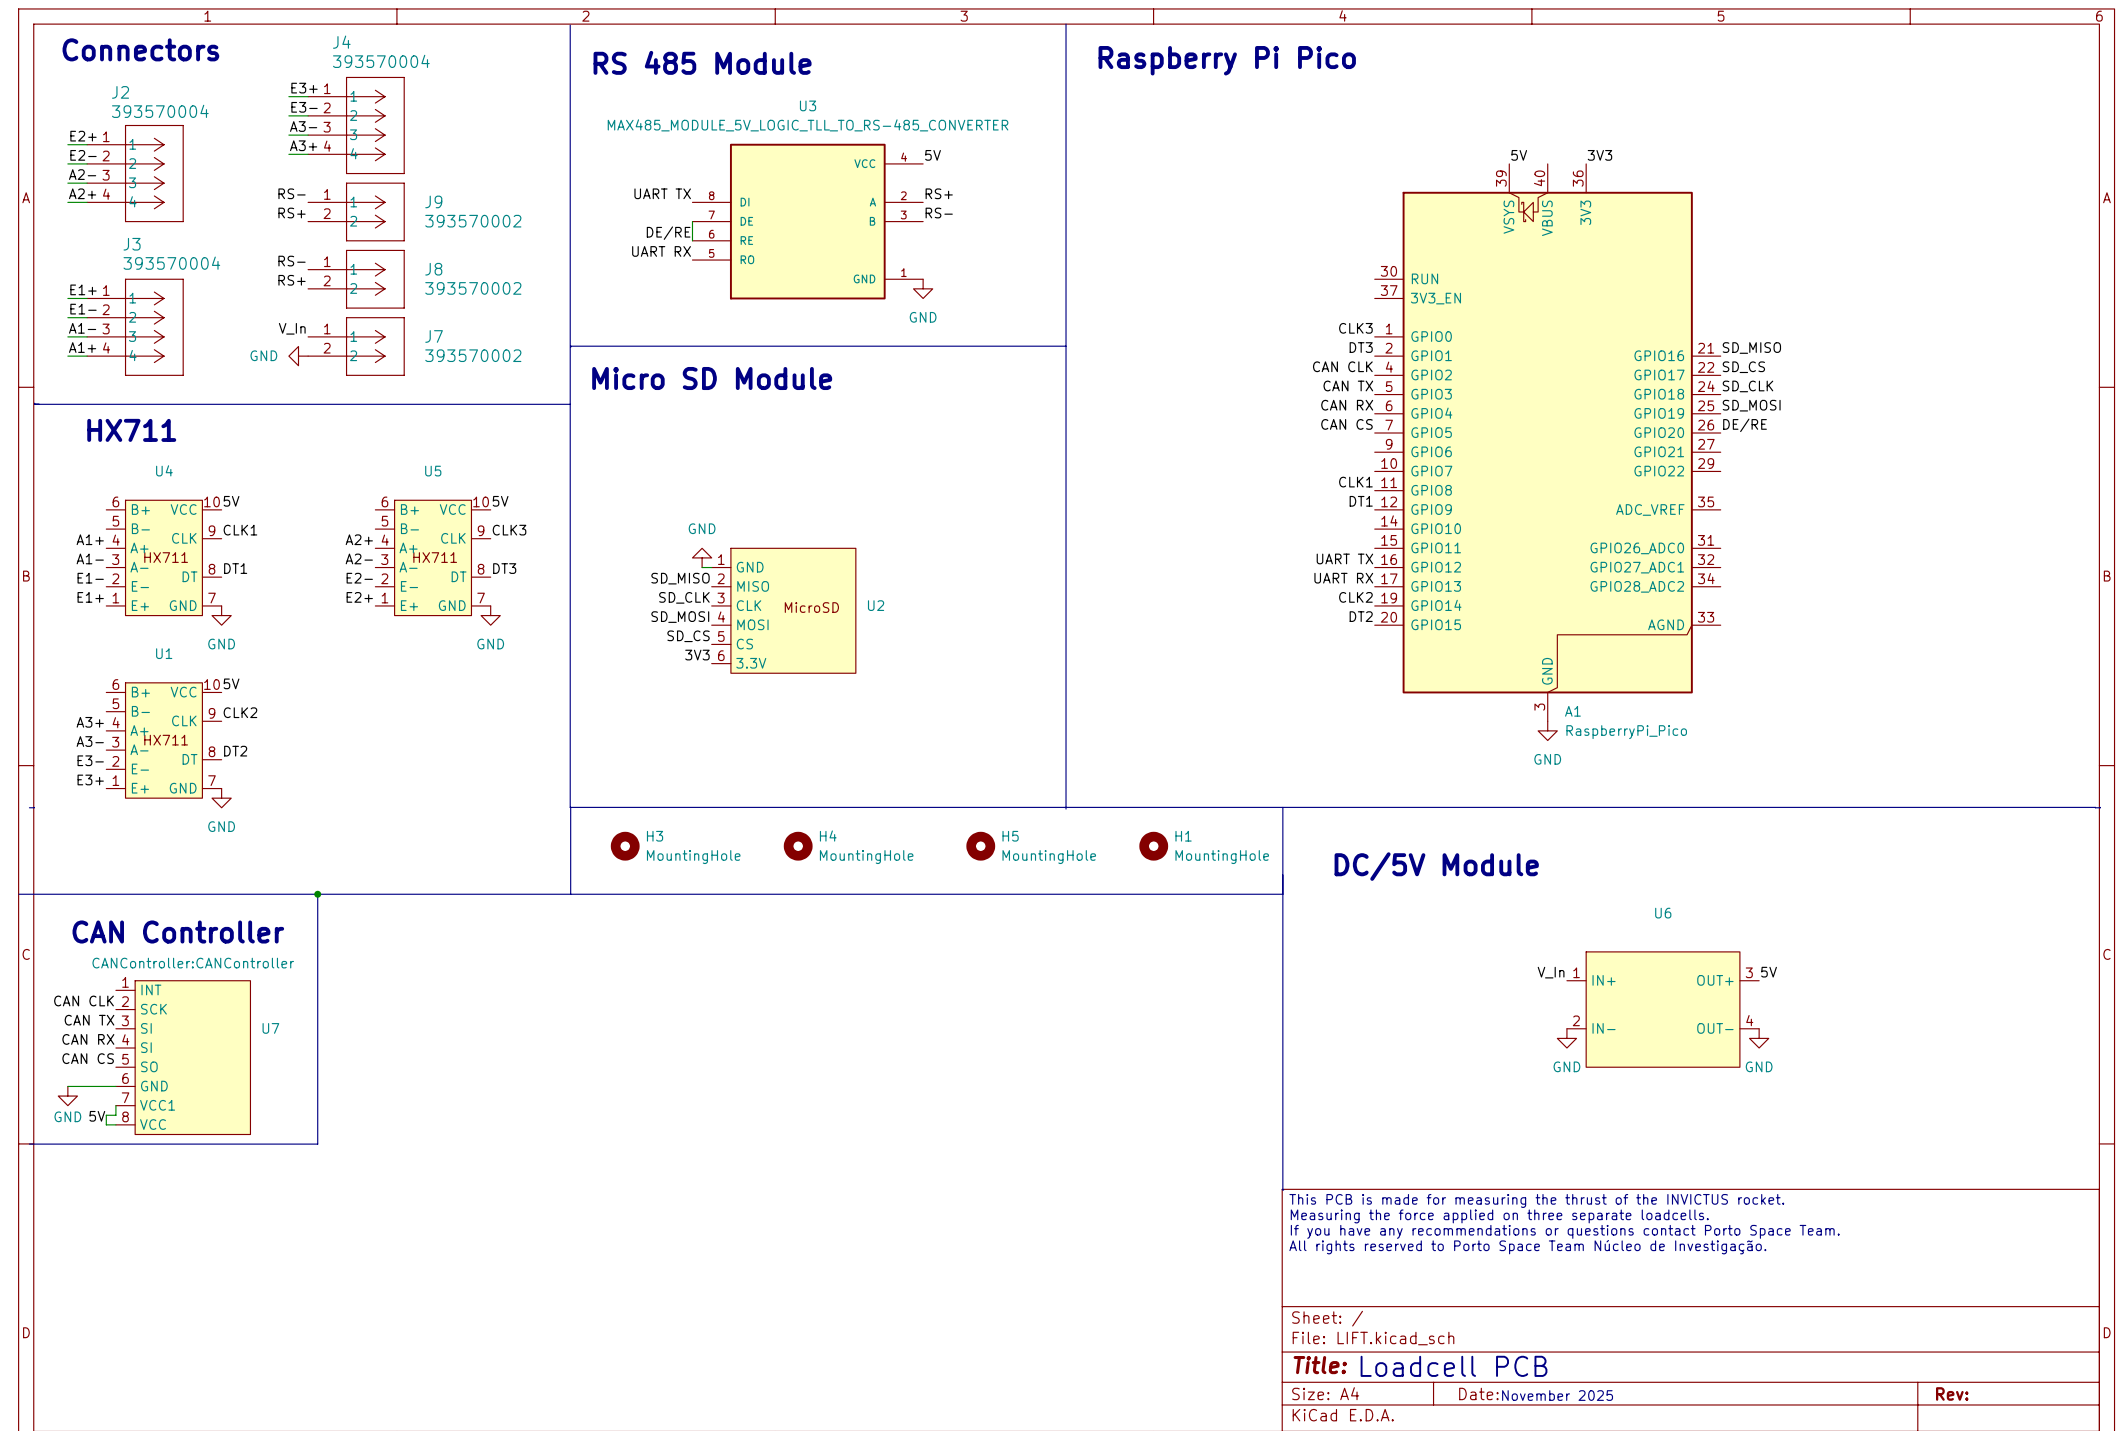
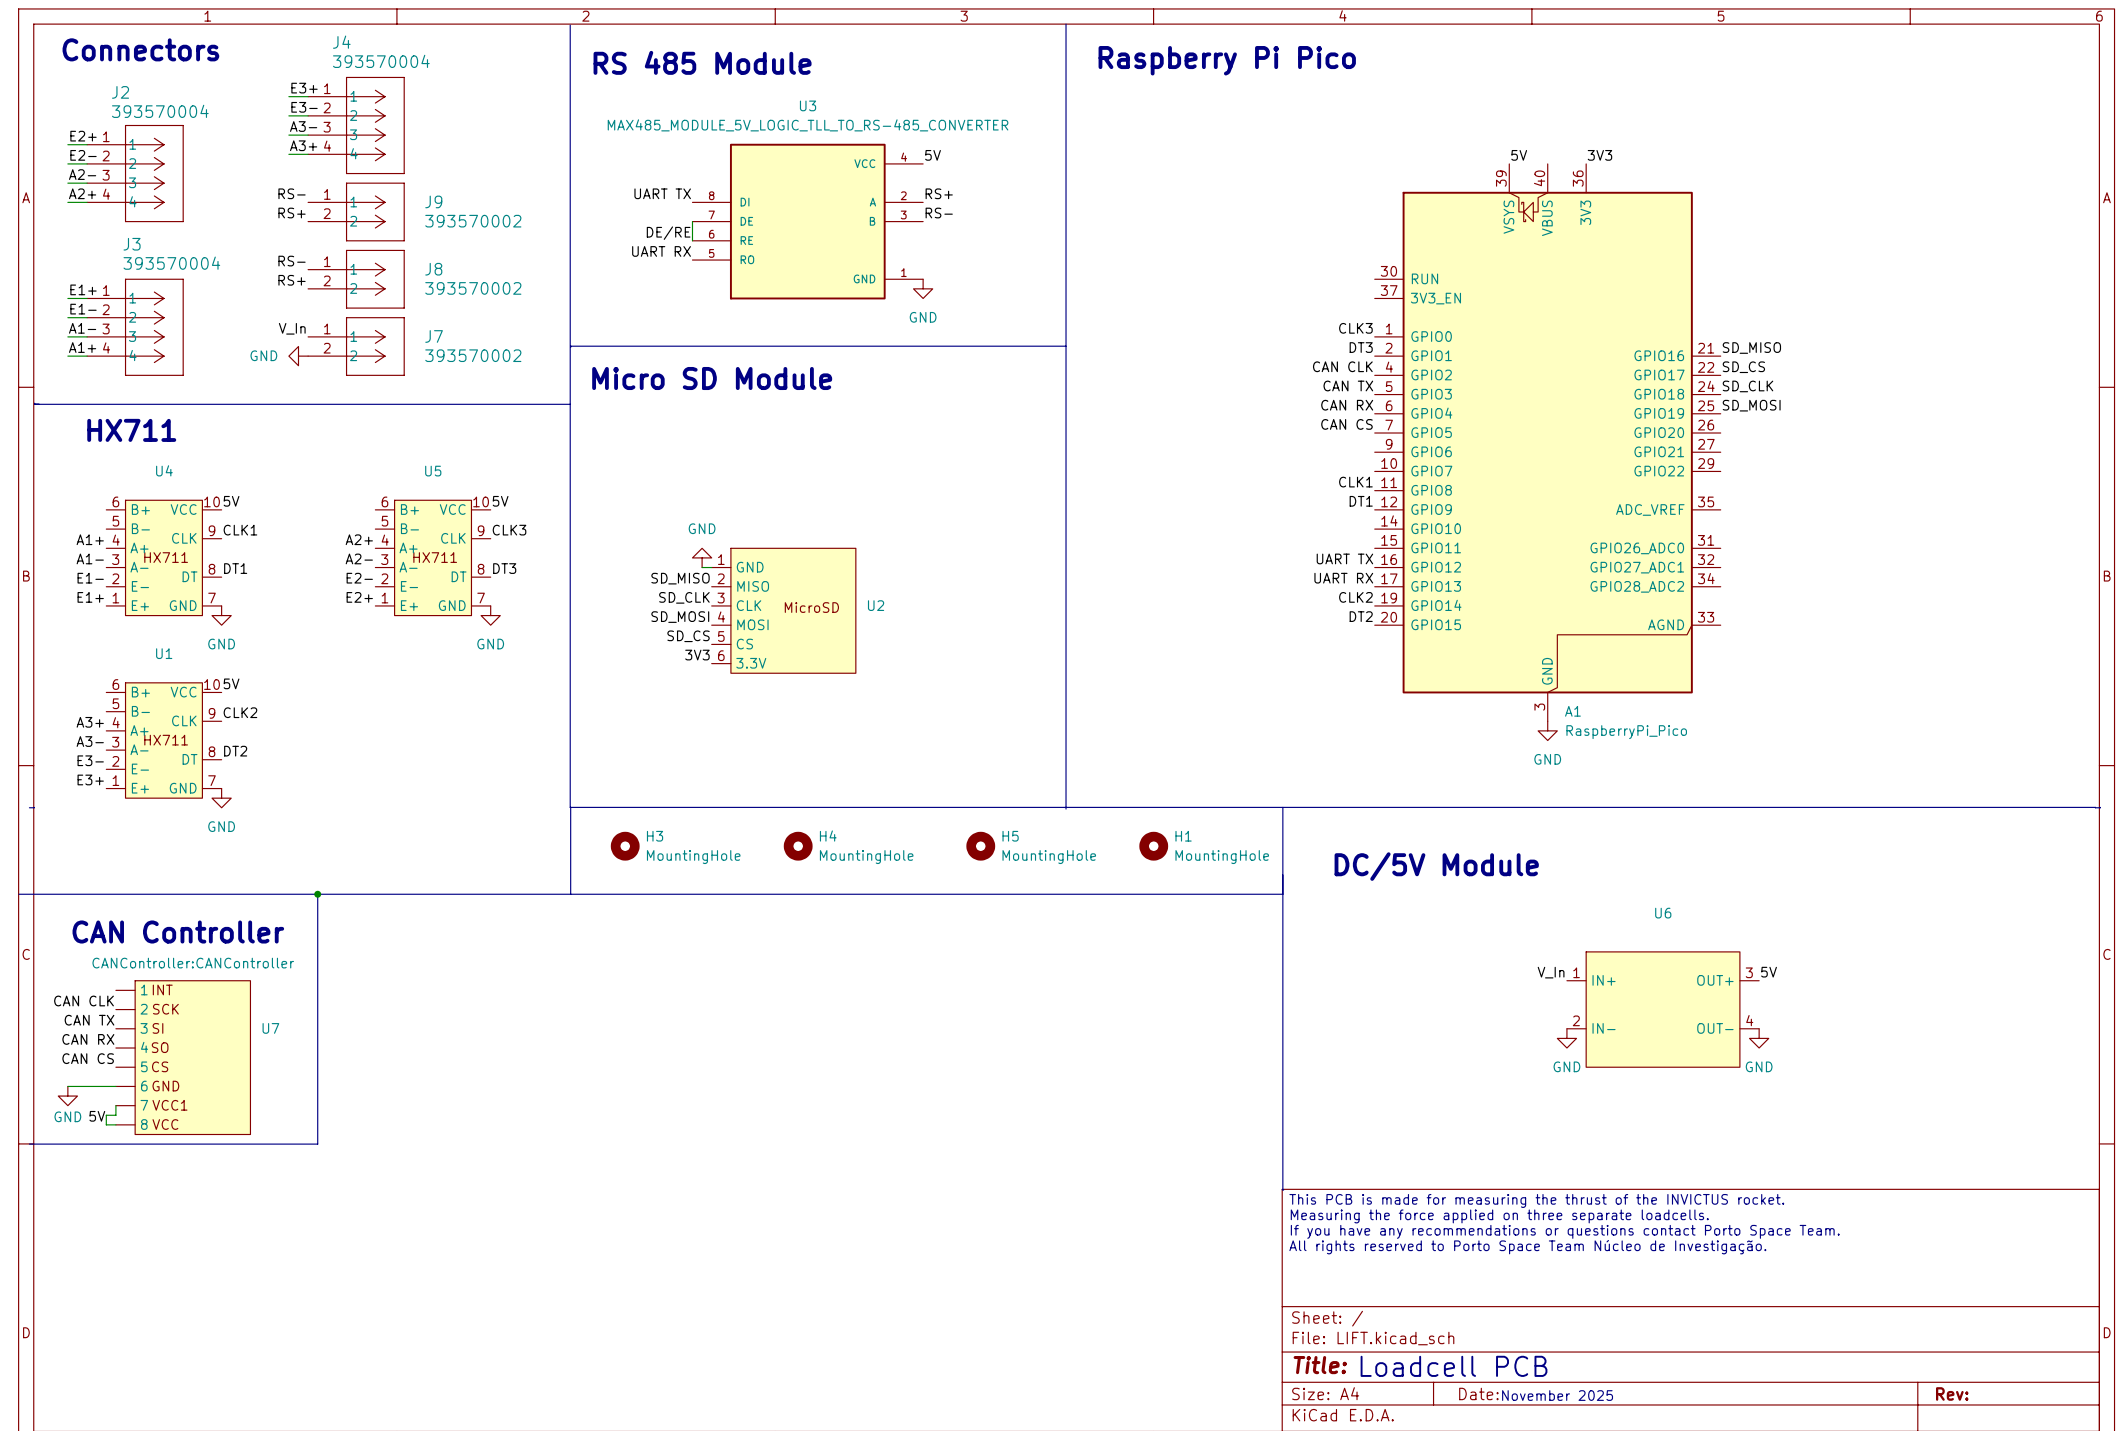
label: DE/RE (1745, 425) -> none
U7 symbol: [115, 980, 251, 1135] -> [115, 980, 251, 1135]

